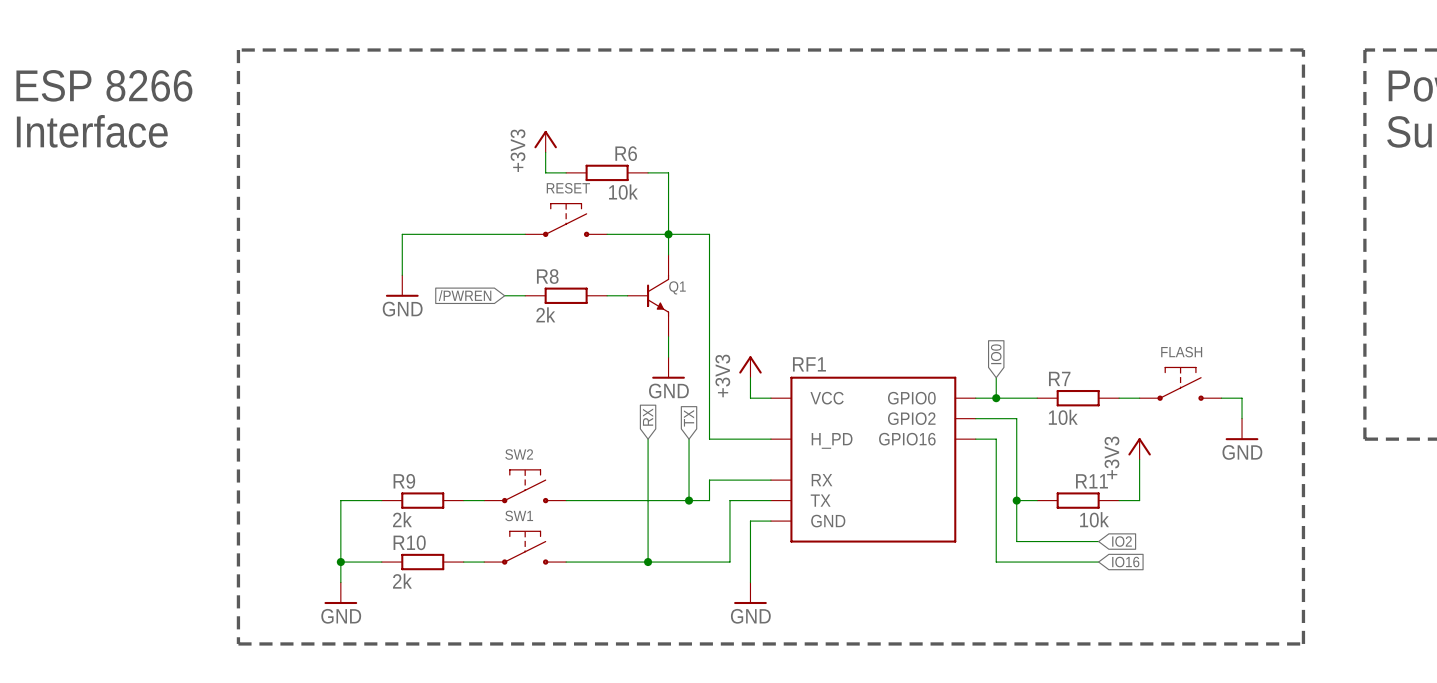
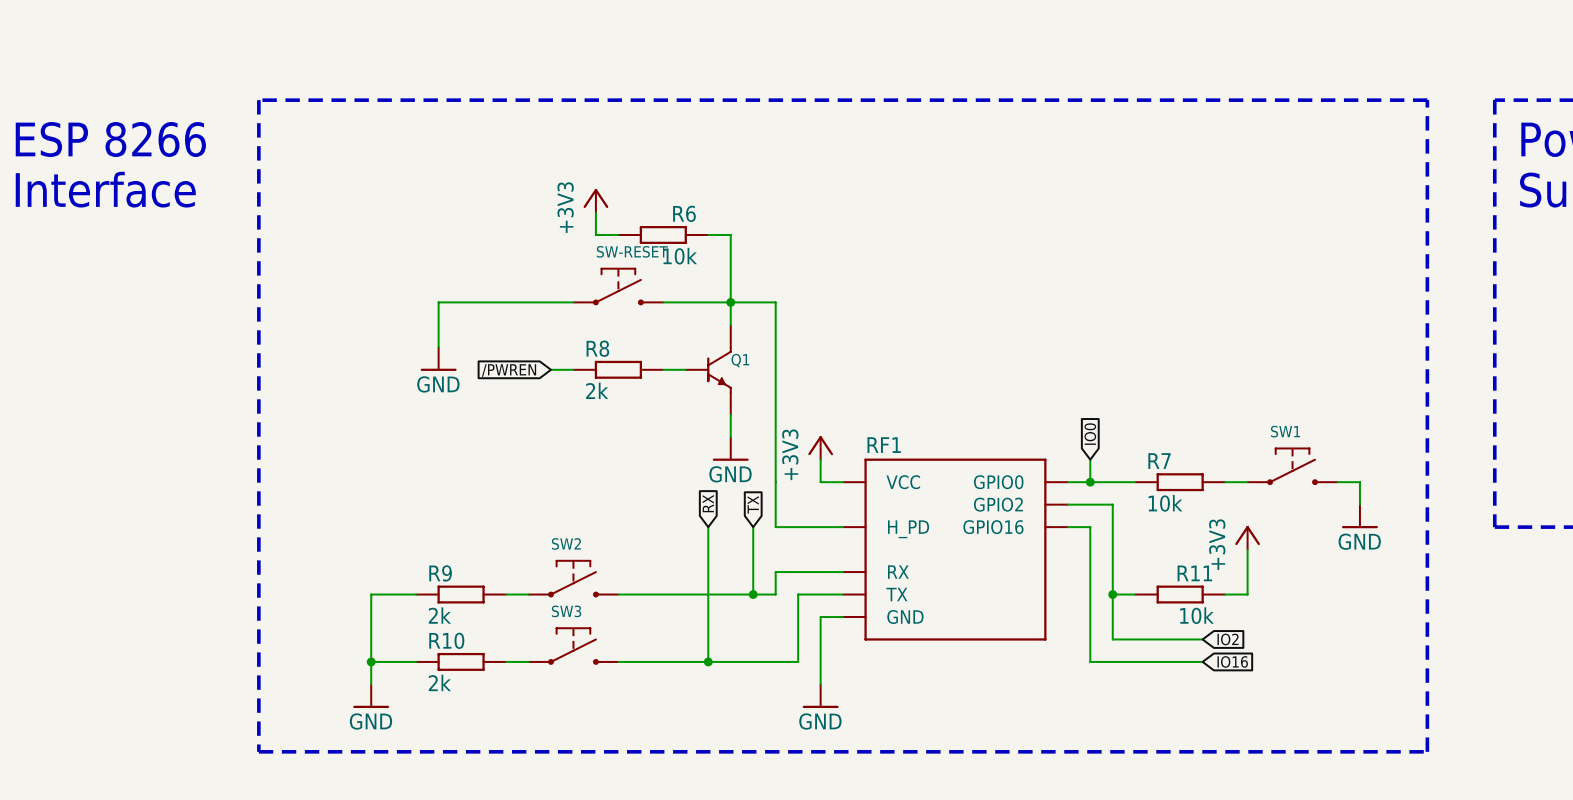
RESET name: RESET (568, 188) -> SW-RESET (632, 251)
FLASH name: FLASH (1181, 352) -> SW1 (1285, 431)
SW1 name: SW1 (519, 515) -> SW3 (566, 611)

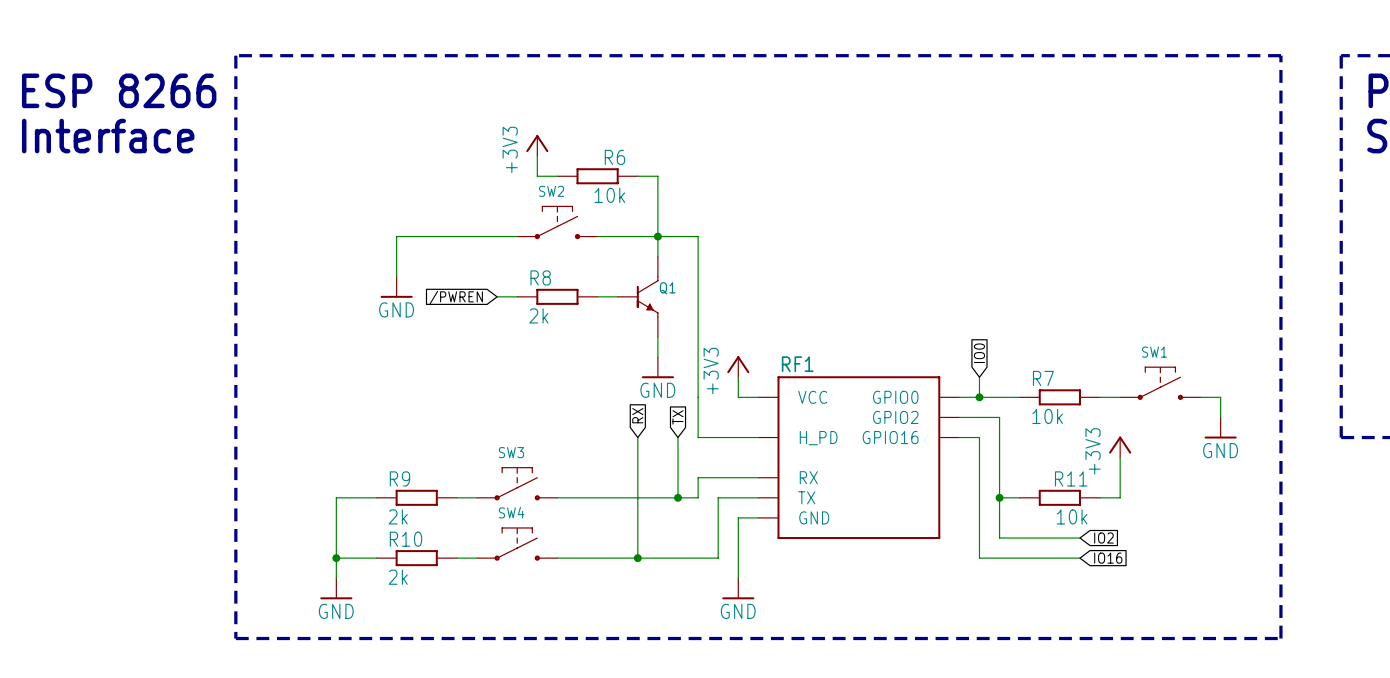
SW-RESET name: SW-RESET (632, 251) -> SW2 (551, 191)
SW2 name: SW2 (566, 543) -> SW3 (511, 452)
SW3 name: SW3 (566, 611) -> SW4 (511, 512)

